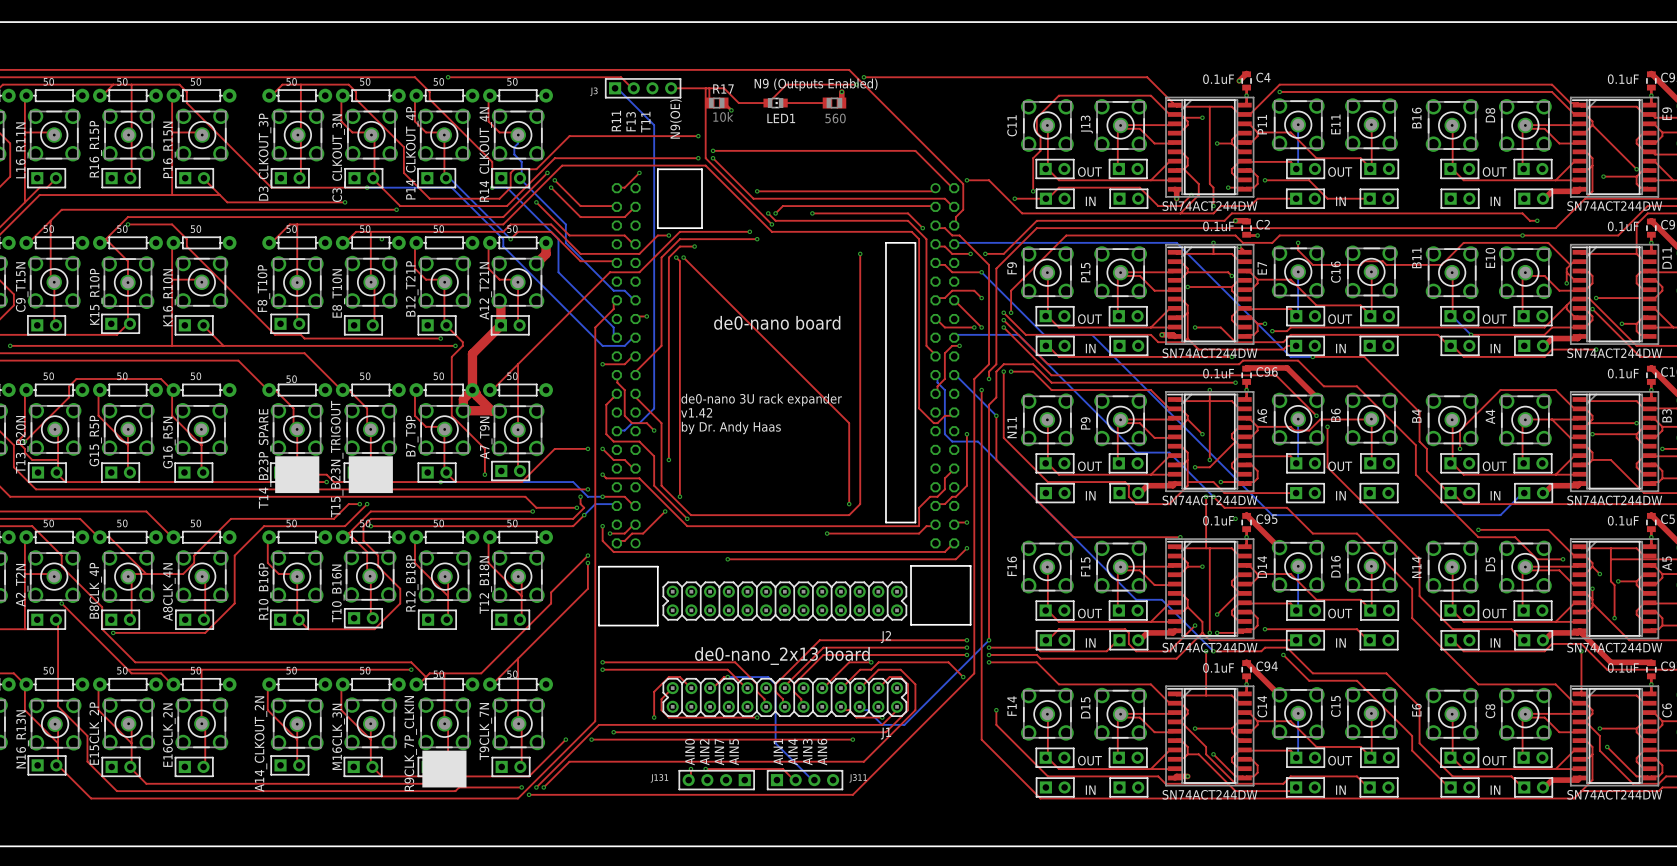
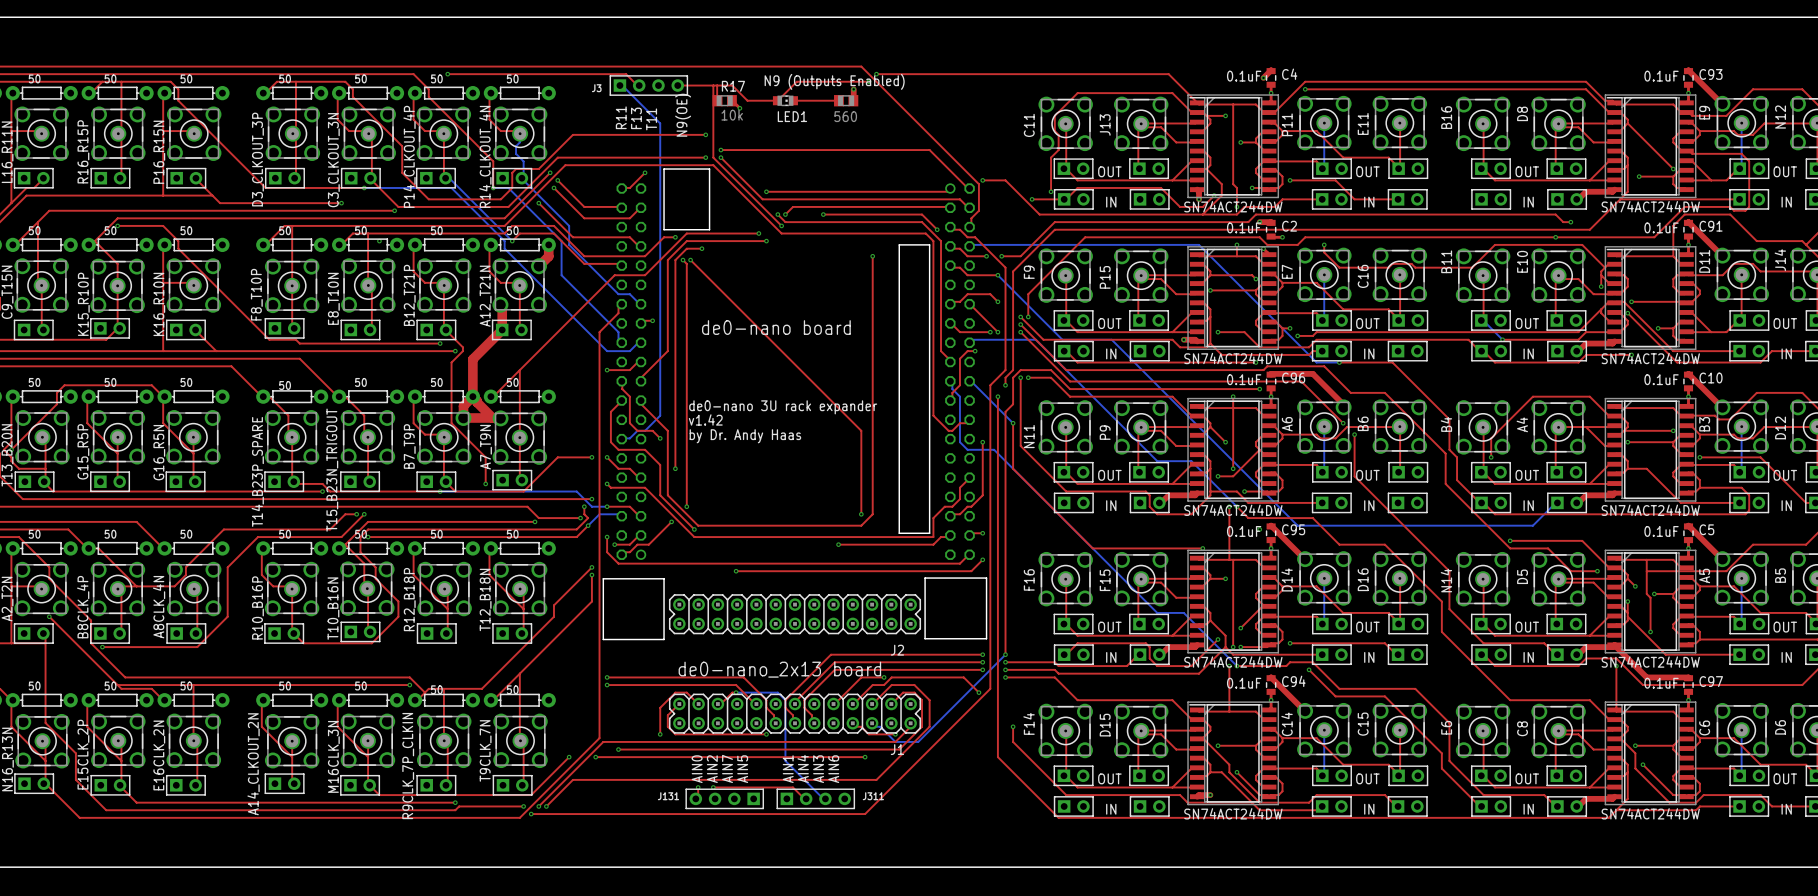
drawing: [275, 456, 320, 494] -> none
drawing: [348, 456, 393, 494] -> none
drawing: [422, 750, 467, 788] -> none

